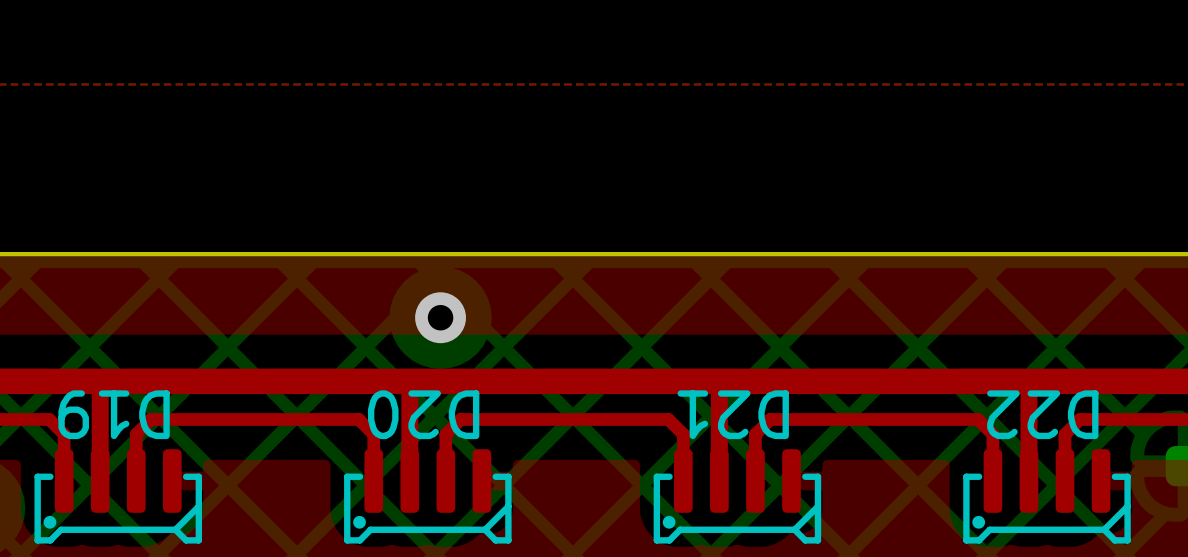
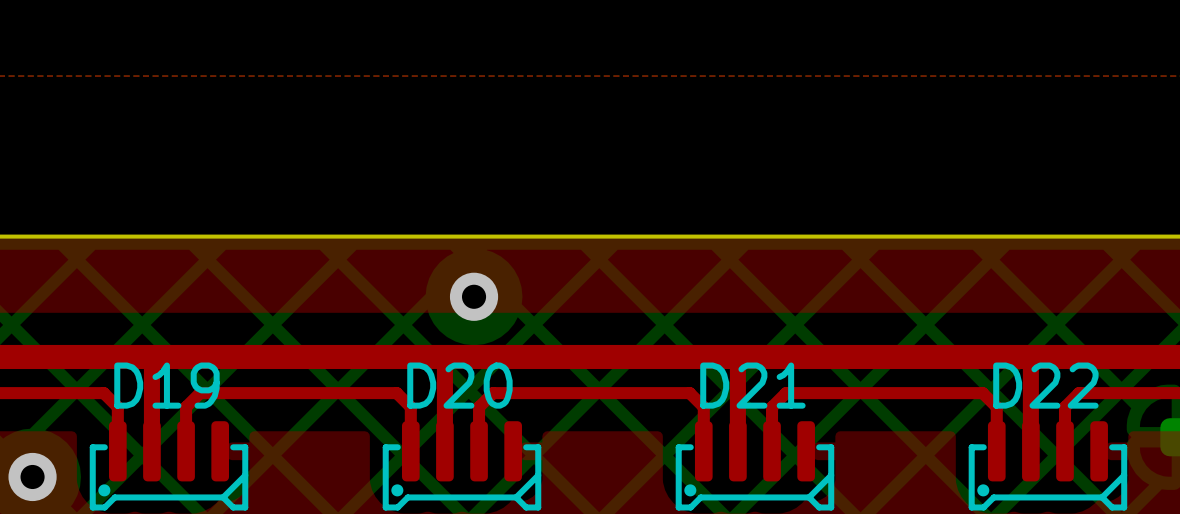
D19 name rotation: 0° (114, 414) -> 180° (166, 385)
D20 name rotation: 0° (423, 414) -> 180° (459, 385)
D21 name rotation: 0° (733, 414) -> 180° (752, 385)
D22 name rotation: 0° (1042, 414) -> 180° (1045, 385)

